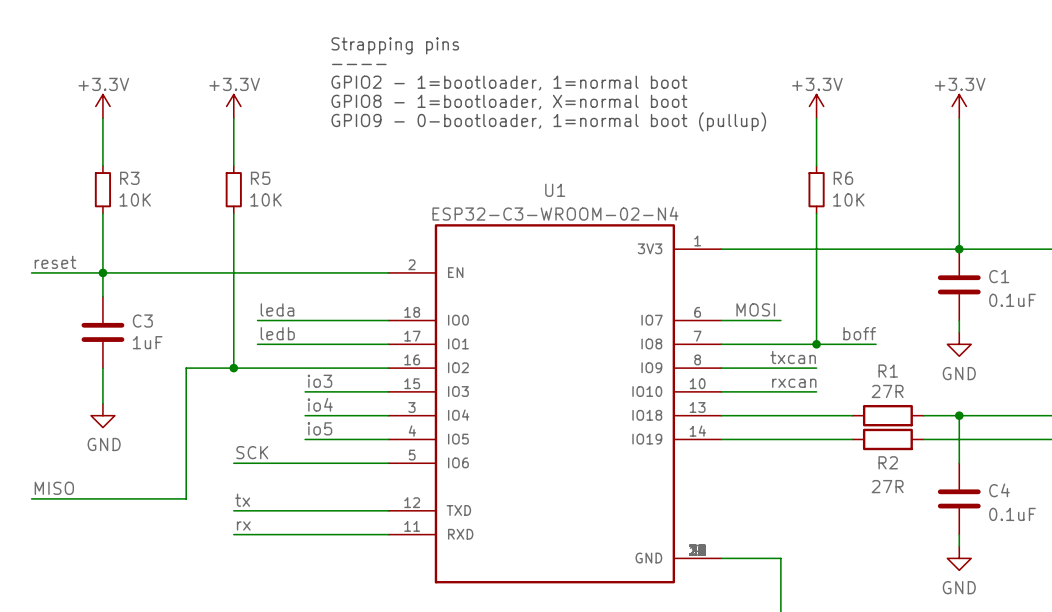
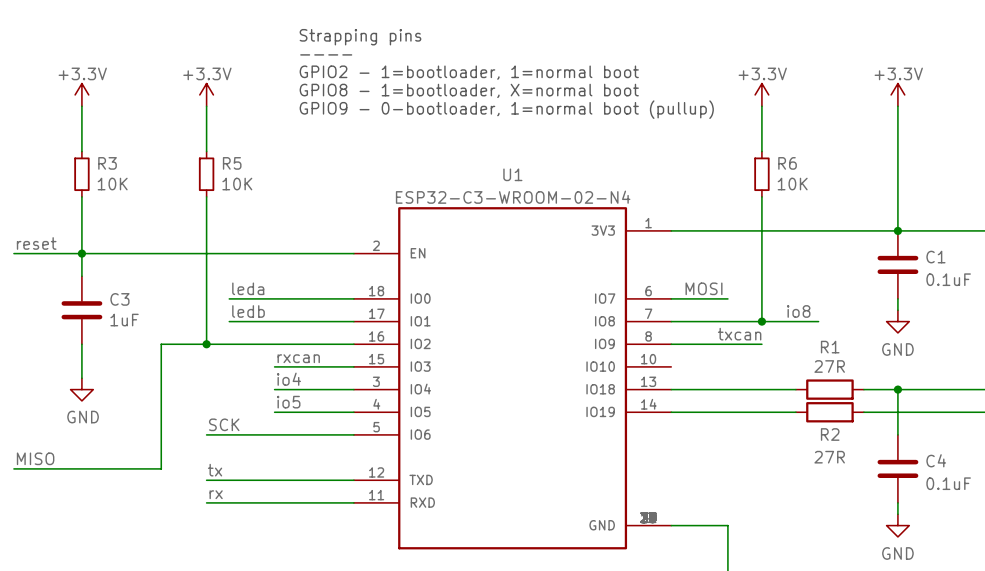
label: boff (859, 333) -> io8 (798, 311)
label: io3 (319, 381) -> rxcan (298, 358)
label: rxcan (794, 383) -> none
wire: (721, 391) (816, 391) -> none

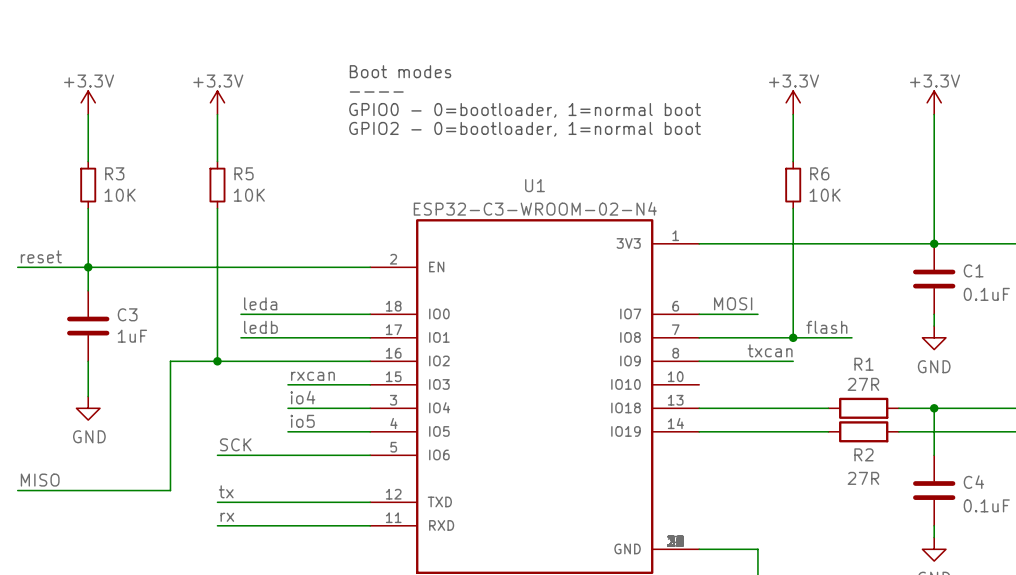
text: Strapping pins (360, 37) -> none
text position: ---- (326, 54) -> ---- (376, 92)
text: none -> Boot modes (400, 71)
text: GPIO2 - 1=bootloader, 1=normal boot (469, 72) -> none
text: GPIO8 - 1=bootloader, X=normal boot (469, 90) -> none
text: none -> GPIO0 - 0=bootloader, 1=normal boot (525, 110)
text: GPIO9 - 0-bootloader, 1=normal boot (pullup) (506, 109) -> none
text: none -> GPIO2 - 0=bootloader, 1=normal boot (525, 129)
label: none -> flash (826, 327)
label: io8 (798, 311) -> none

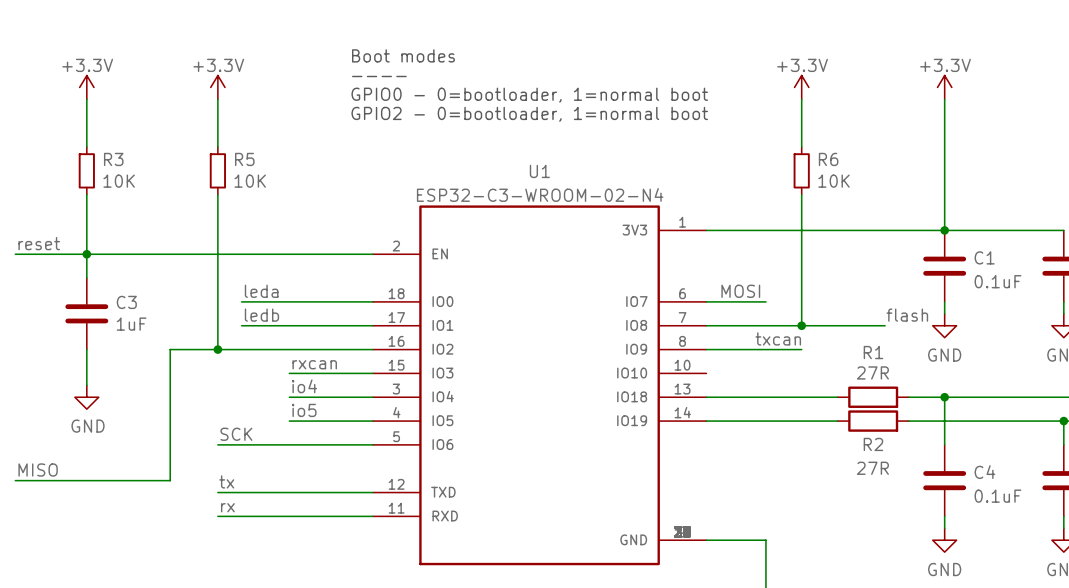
label position: flash (826, 327) -> flash (907, 315)
wire: none -> (861, 325) (885, 325)

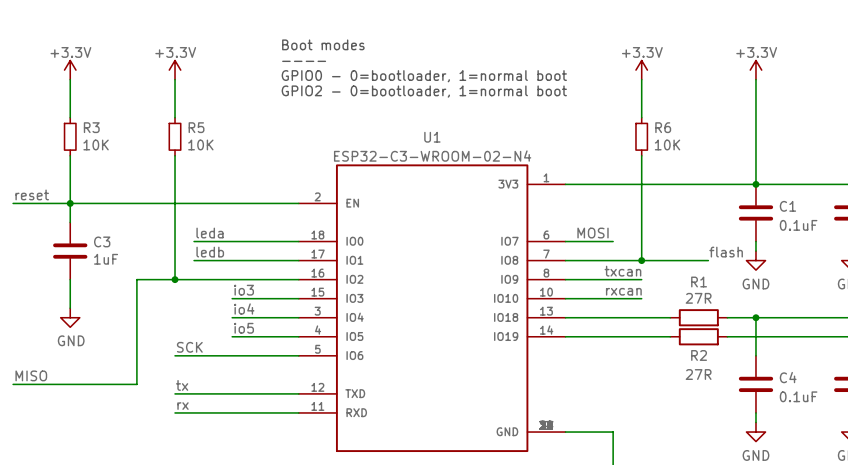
label: rxcan (314, 364) -> io3 (244, 290)
label: none -> rxcan (623, 291)
wire: none -> (565, 298) (641, 298)

